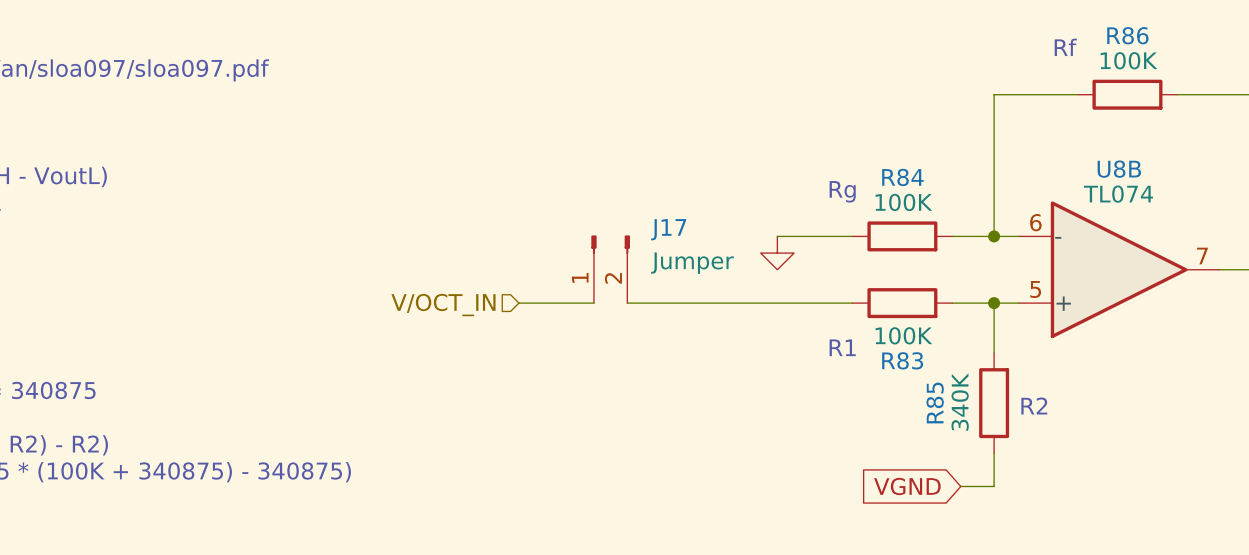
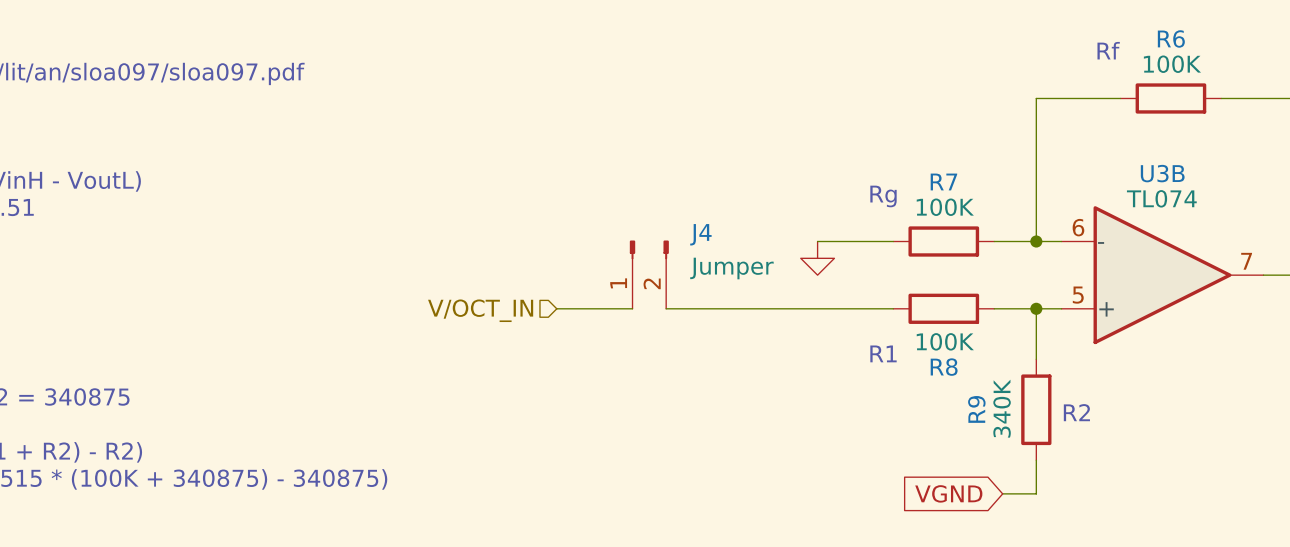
R86 name: R86 (1127, 35) -> R6 (1171, 38)
U8B name: U8B (1119, 169) -> U3B (1162, 173)
R84 name: R84 (902, 177) -> R7 (943, 181)
J17 name: J17 (668, 229) -> J4 (700, 234)
R83 name: R83 (902, 360) -> R8 (944, 367)
R85 name: R85 (935, 403) -> R9 (976, 409)

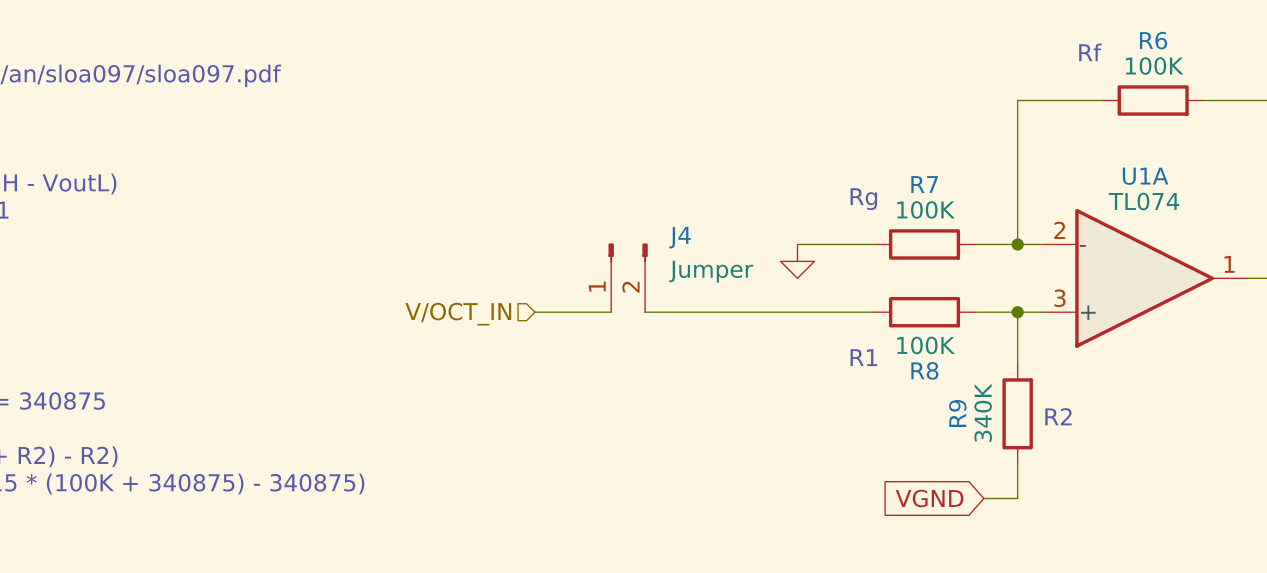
U3B name: U3B (1162, 173) -> U1A (1145, 176)
U3B pin number: 6 (1078, 227) -> 2 (1059, 230)
U3B pin number: 7 (1246, 261) -> 1 (1229, 264)
U3B pin number: 5 (1078, 295) -> 3 (1059, 298)

